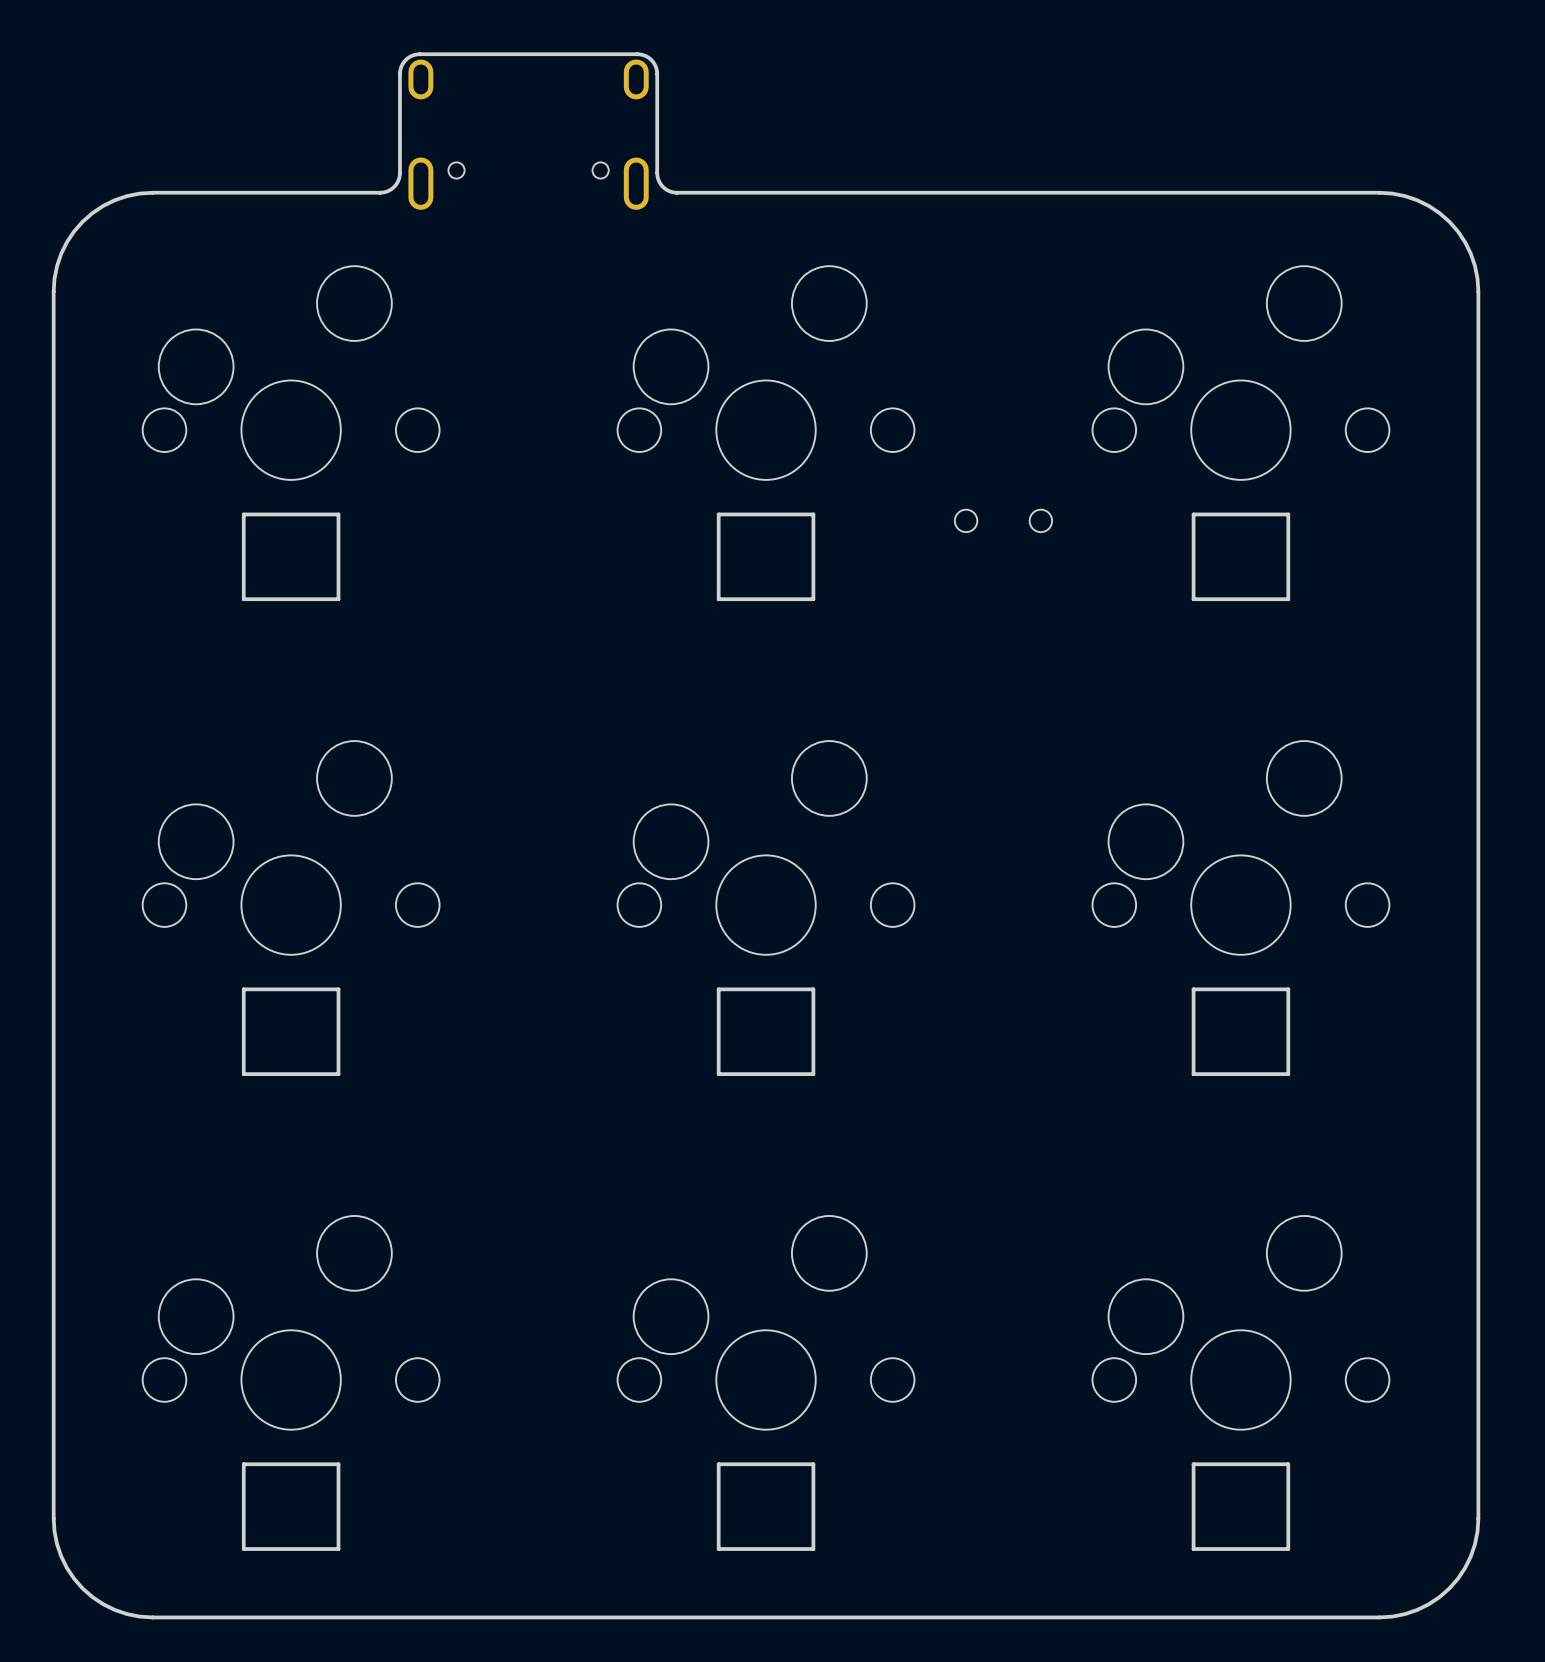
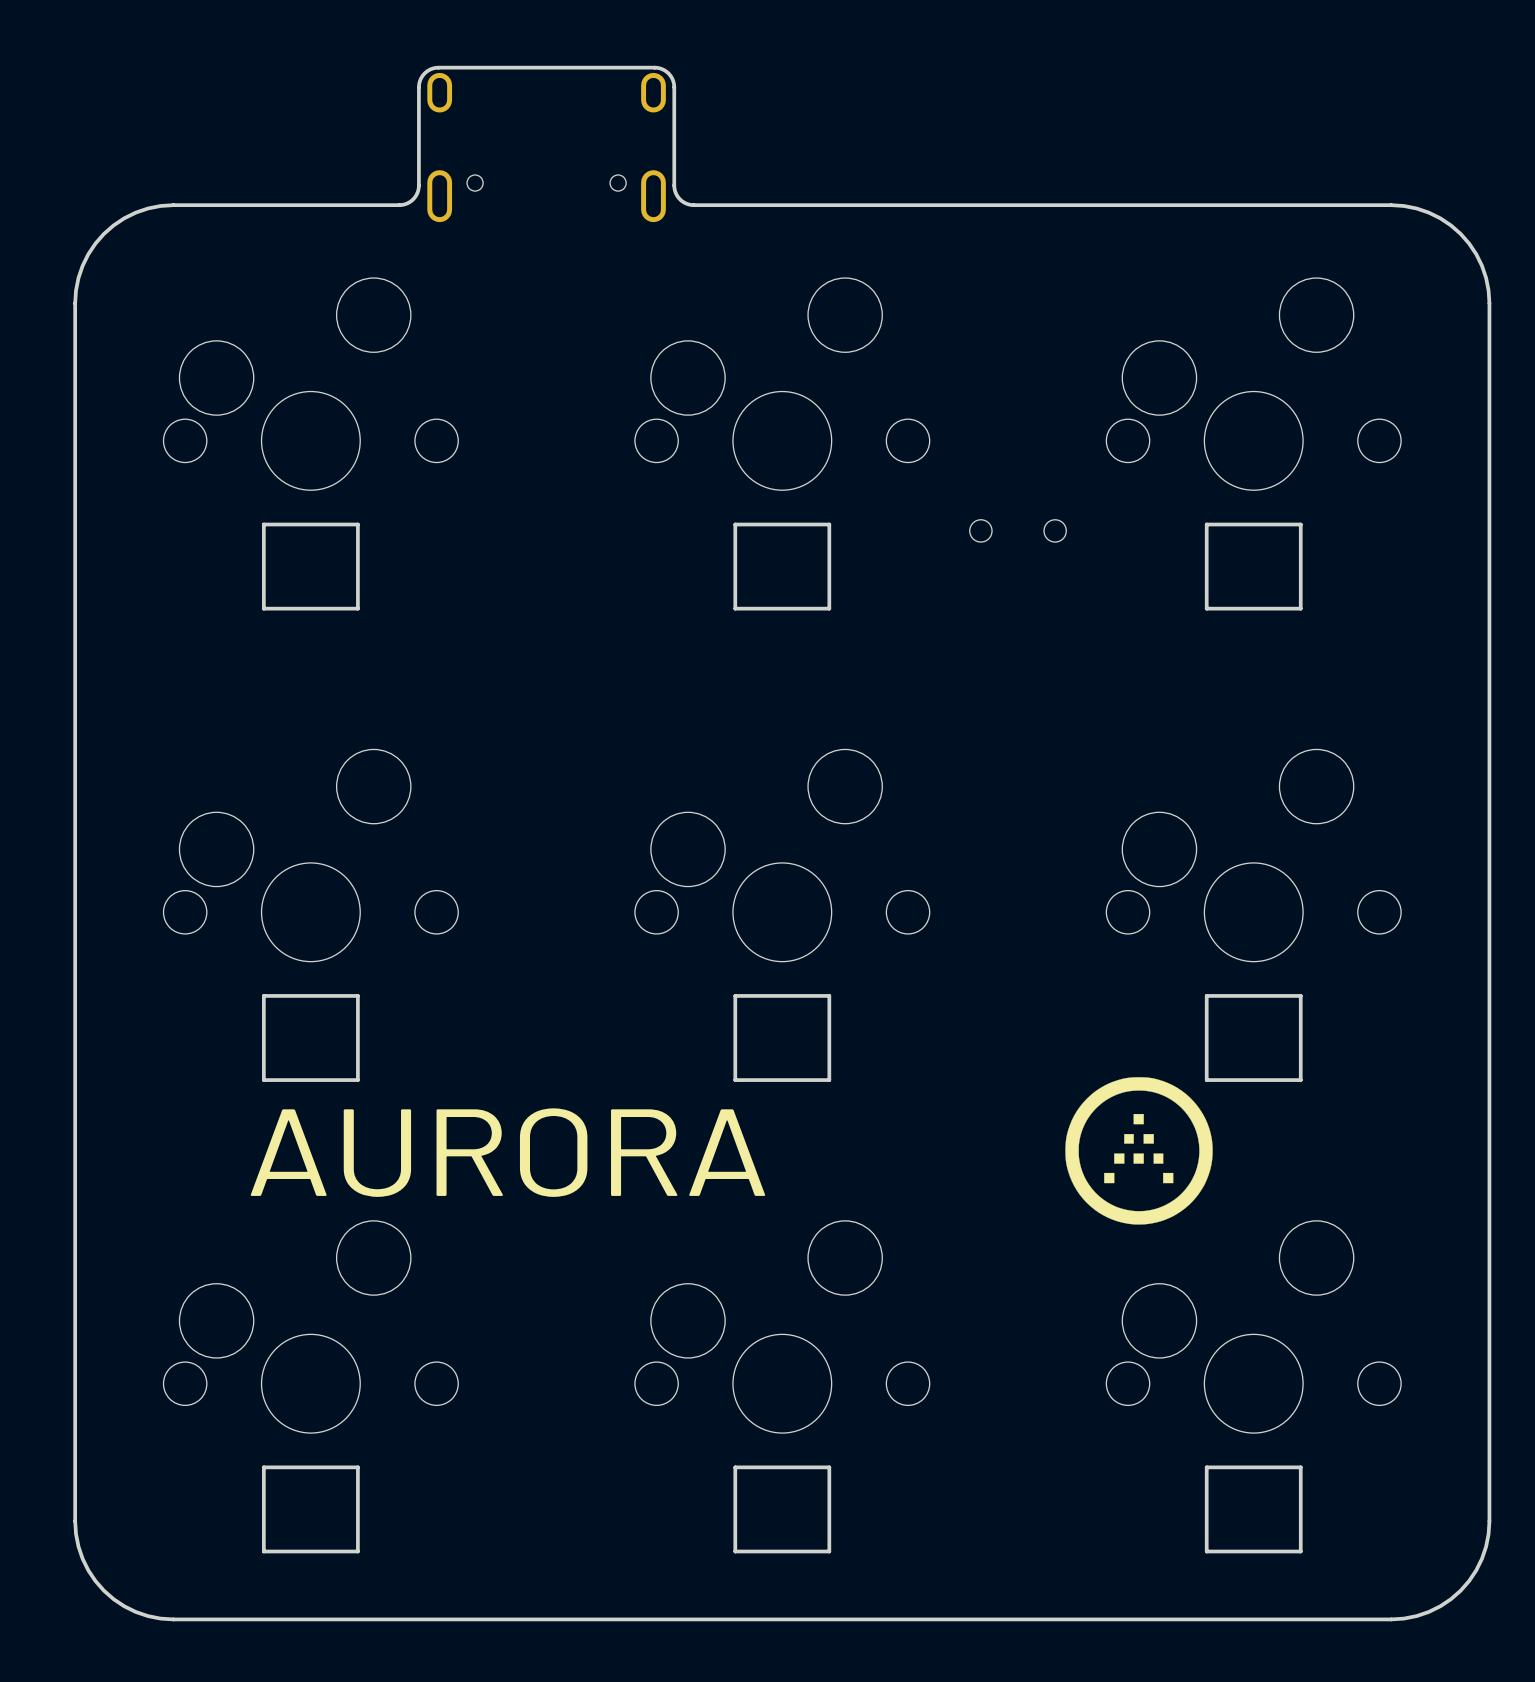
drawing: none -> [1065, 1077, 1213, 1225]
text: none -> AURORA (507, 1152)

